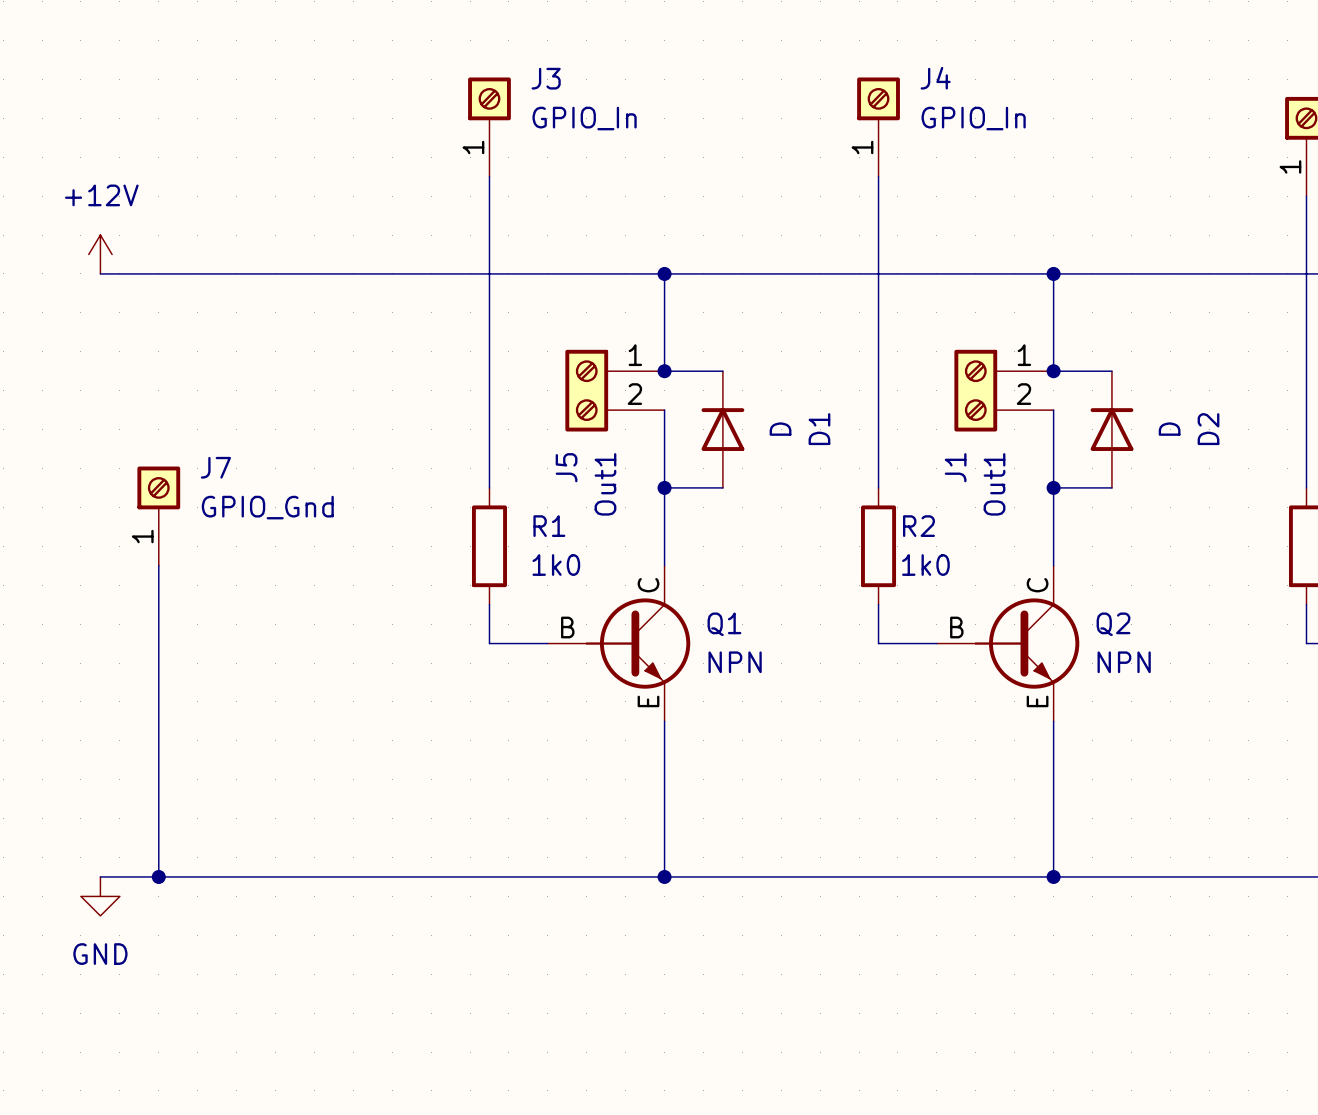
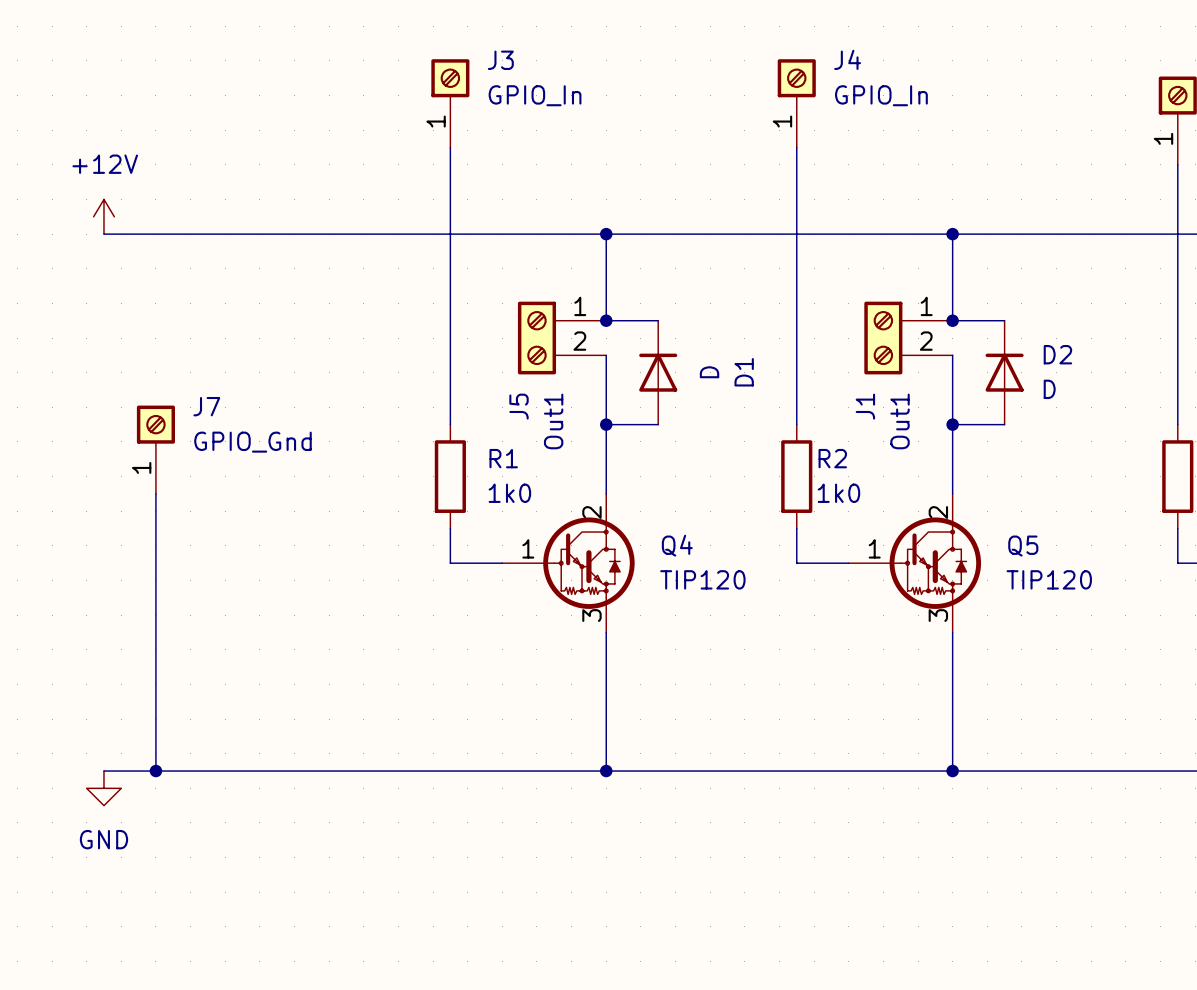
D2 value rotation: 0° (1169, 429) -> 90° clockwise (1049, 389)
D2 name rotation: 0° (1208, 429) -> 90° clockwise (1057, 354)
Q1: NPN (619, 643) -> none
Q4: none -> TIP120 (568, 563)
Q2: NPN (1008, 643) -> none
Q5: none -> TIP120 (914, 563)

